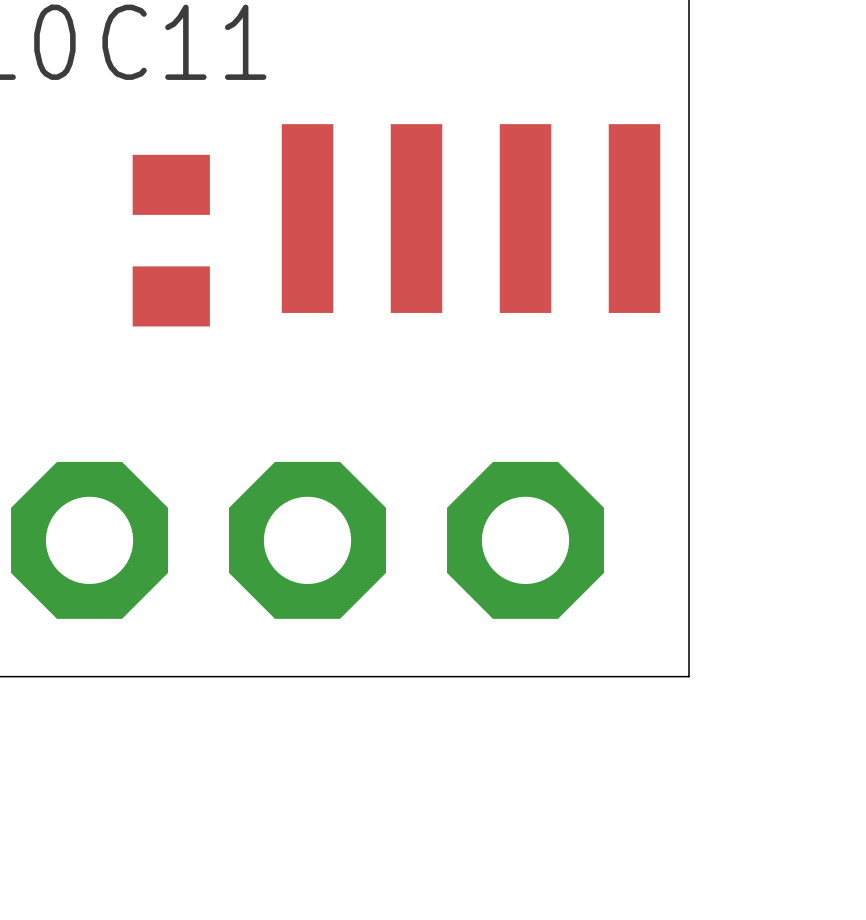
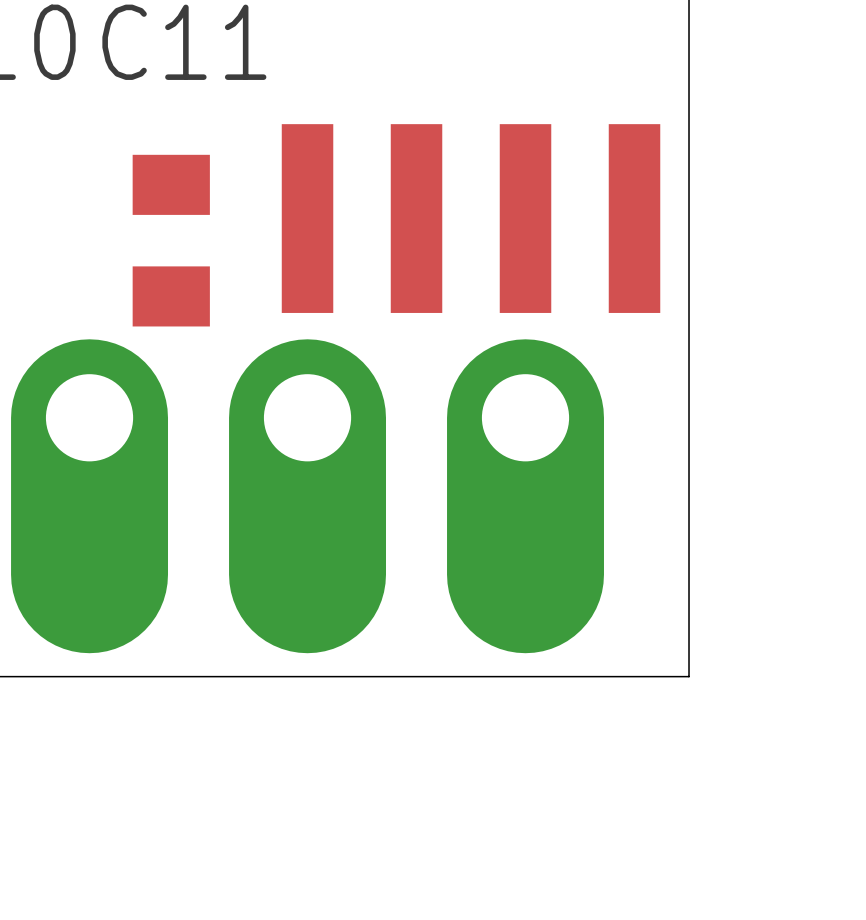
part footprint: [11, 461, 169, 619] -> [11, 339, 169, 654]
part footprint: [229, 461, 386, 619] -> [229, 339, 386, 654]
part footprint: [447, 461, 604, 619] -> [447, 339, 604, 654]

